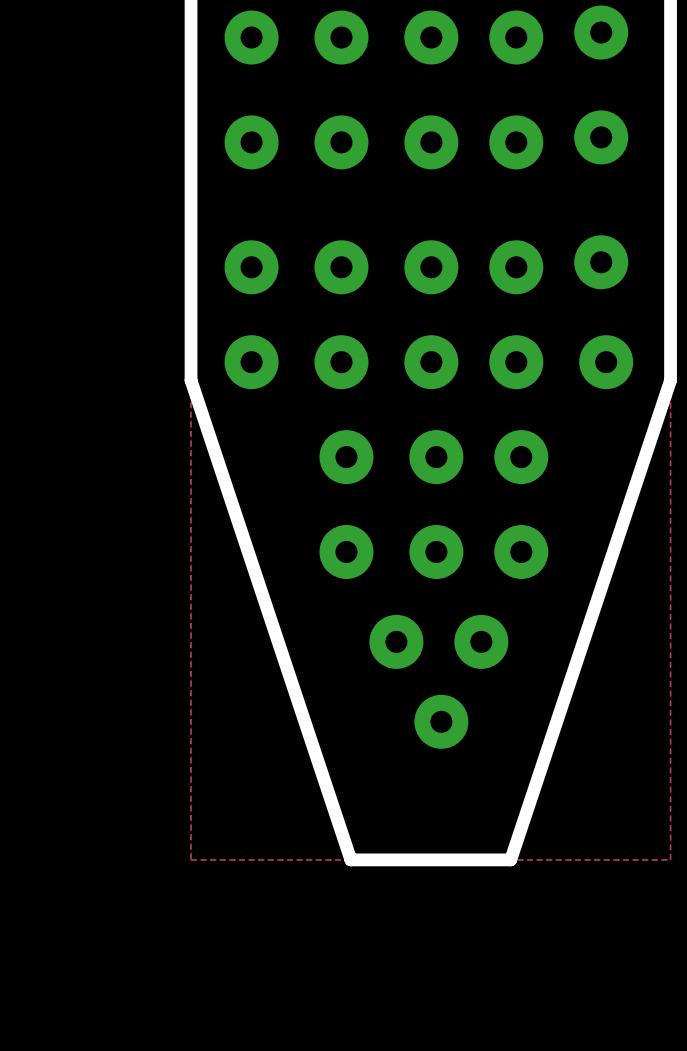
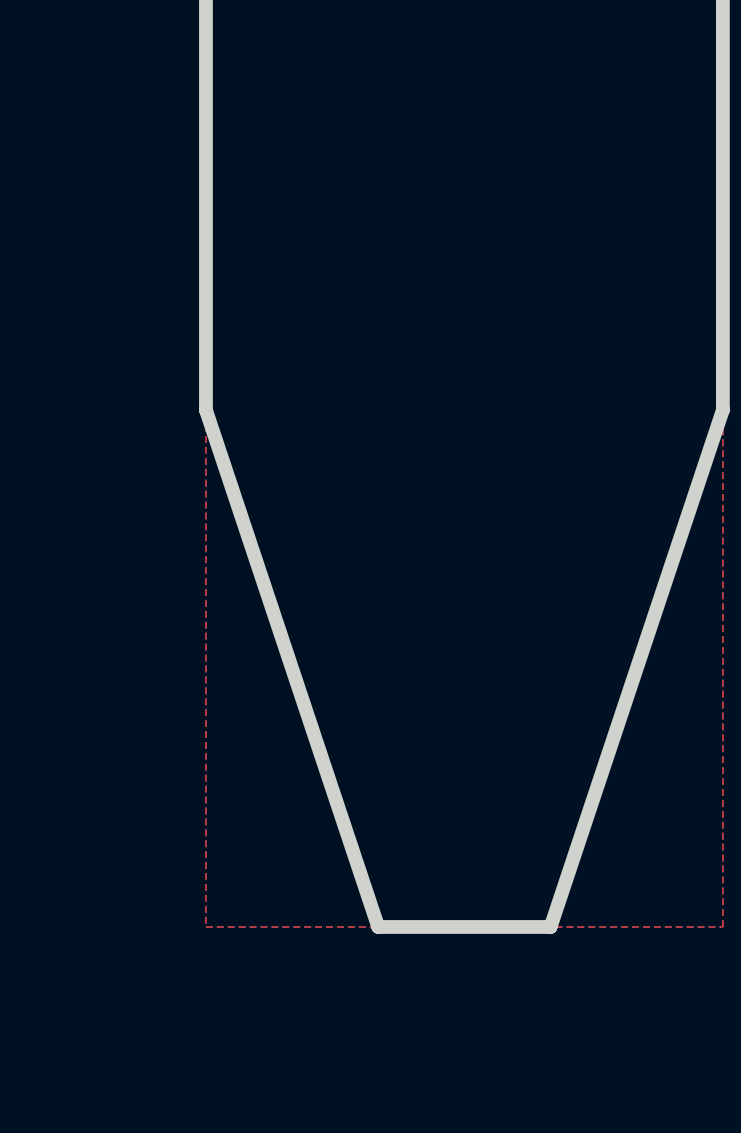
via: (601, 32) -> none
via: (251, 37) -> none
via: (341, 37) -> none
via: (431, 37) -> none
via: (516, 37) -> none
via: (601, 137) -> none
via: (251, 142) -> none
via: (341, 142) -> none
via: (431, 142) -> none
via: (516, 142) -> none
via: (601, 262) -> none
via: (251, 267) -> none
via: (341, 267) -> none
via: (431, 267) -> none
via: (516, 267) -> none
via: (251, 362) -> none
via: (341, 362) -> none
via: (431, 362) -> none
via: (516, 362) -> none
via: (606, 362) -> none
via: (346, 457) -> none
via: (436, 457) -> none
via: (521, 457) -> none
via: (346, 551) -> none
via: (436, 551) -> none
via: (521, 551) -> none
via: (396, 641) -> none
via: (481, 641) -> none
via: (441, 721) -> none

